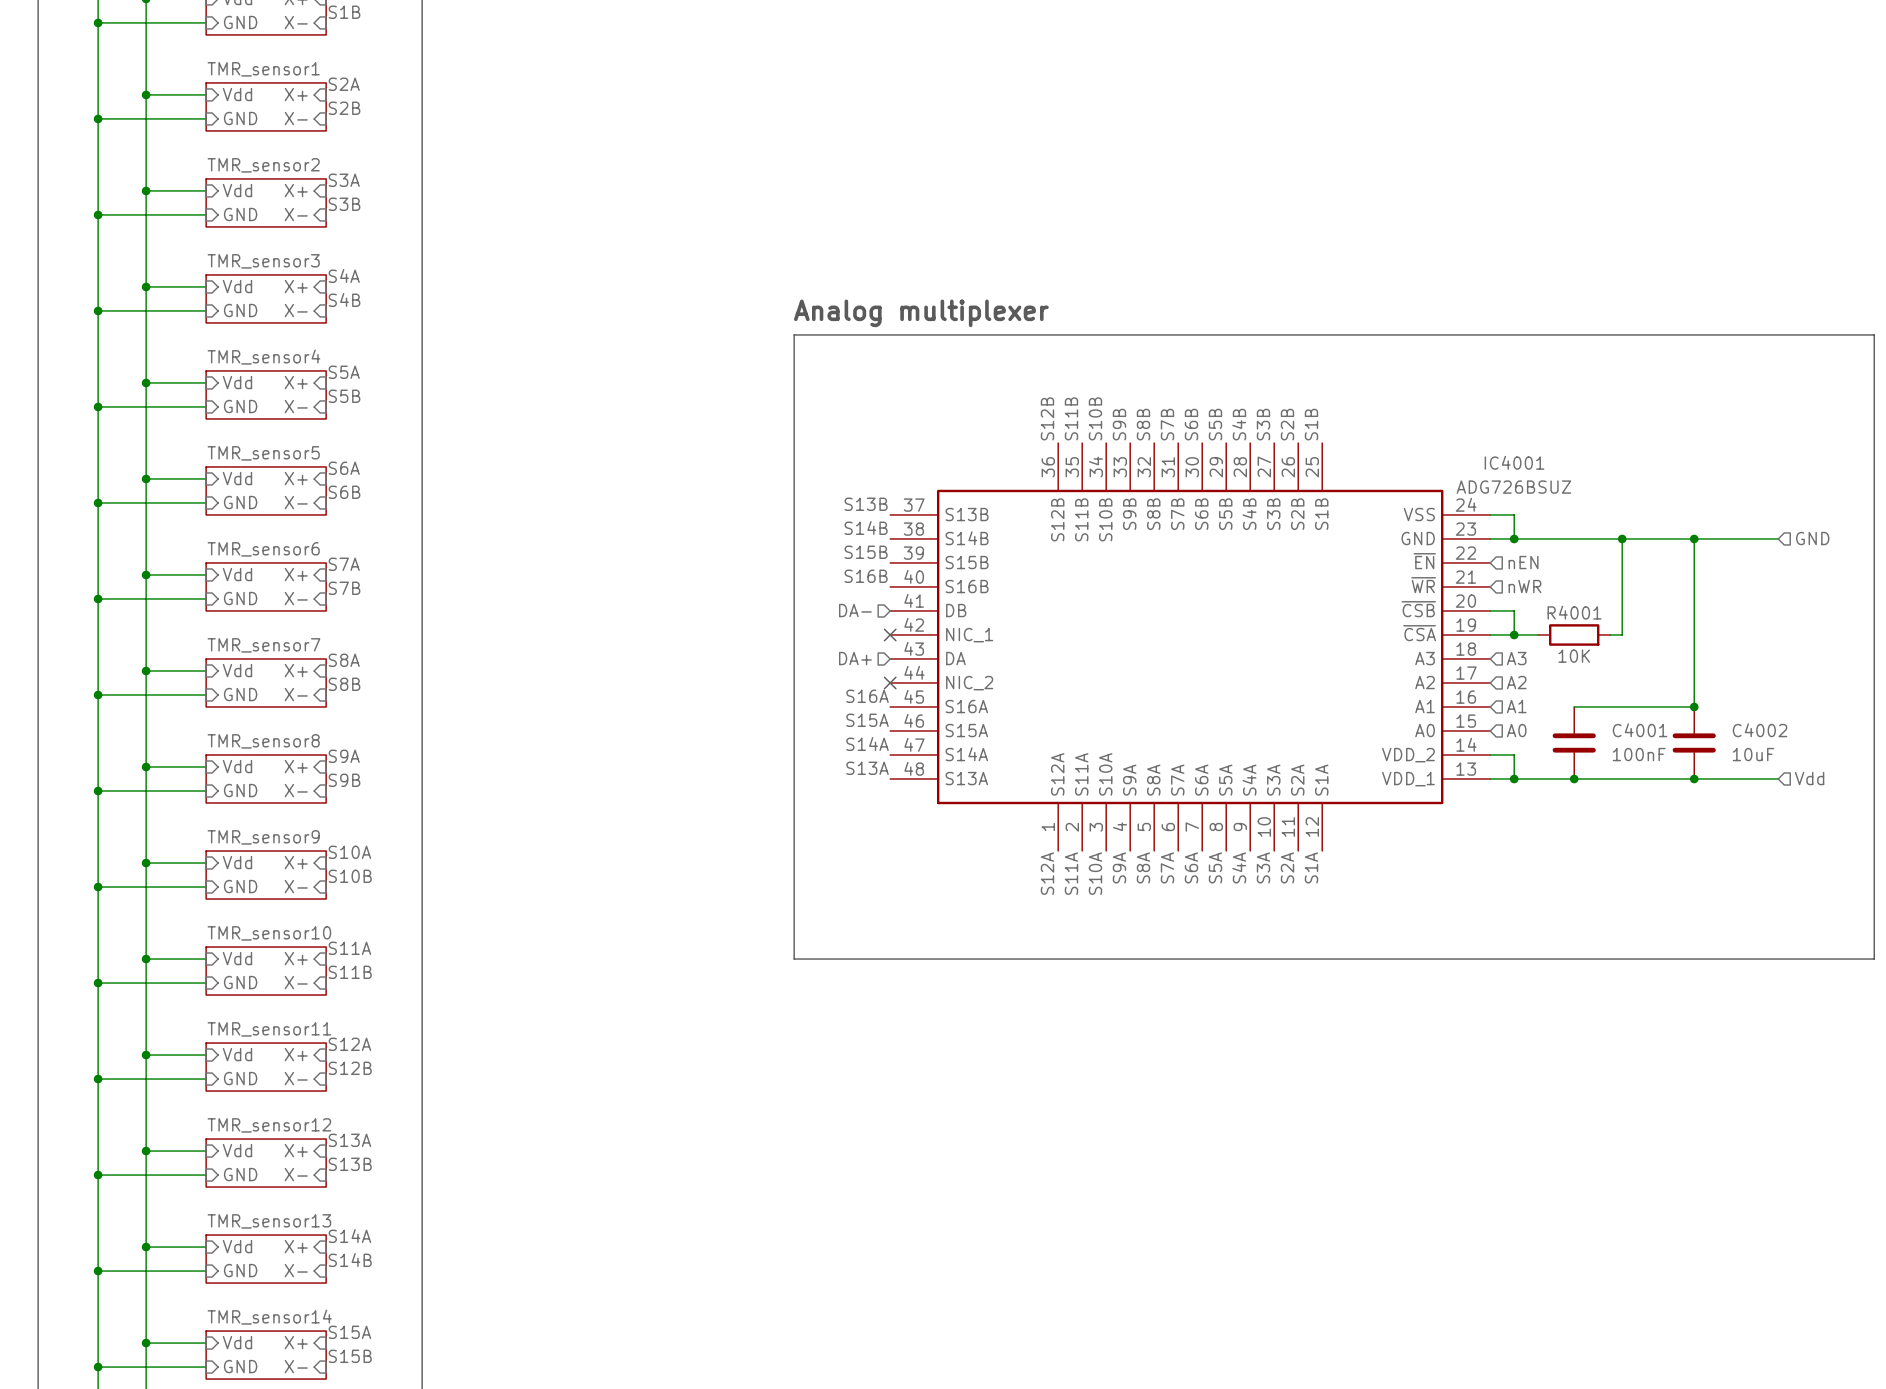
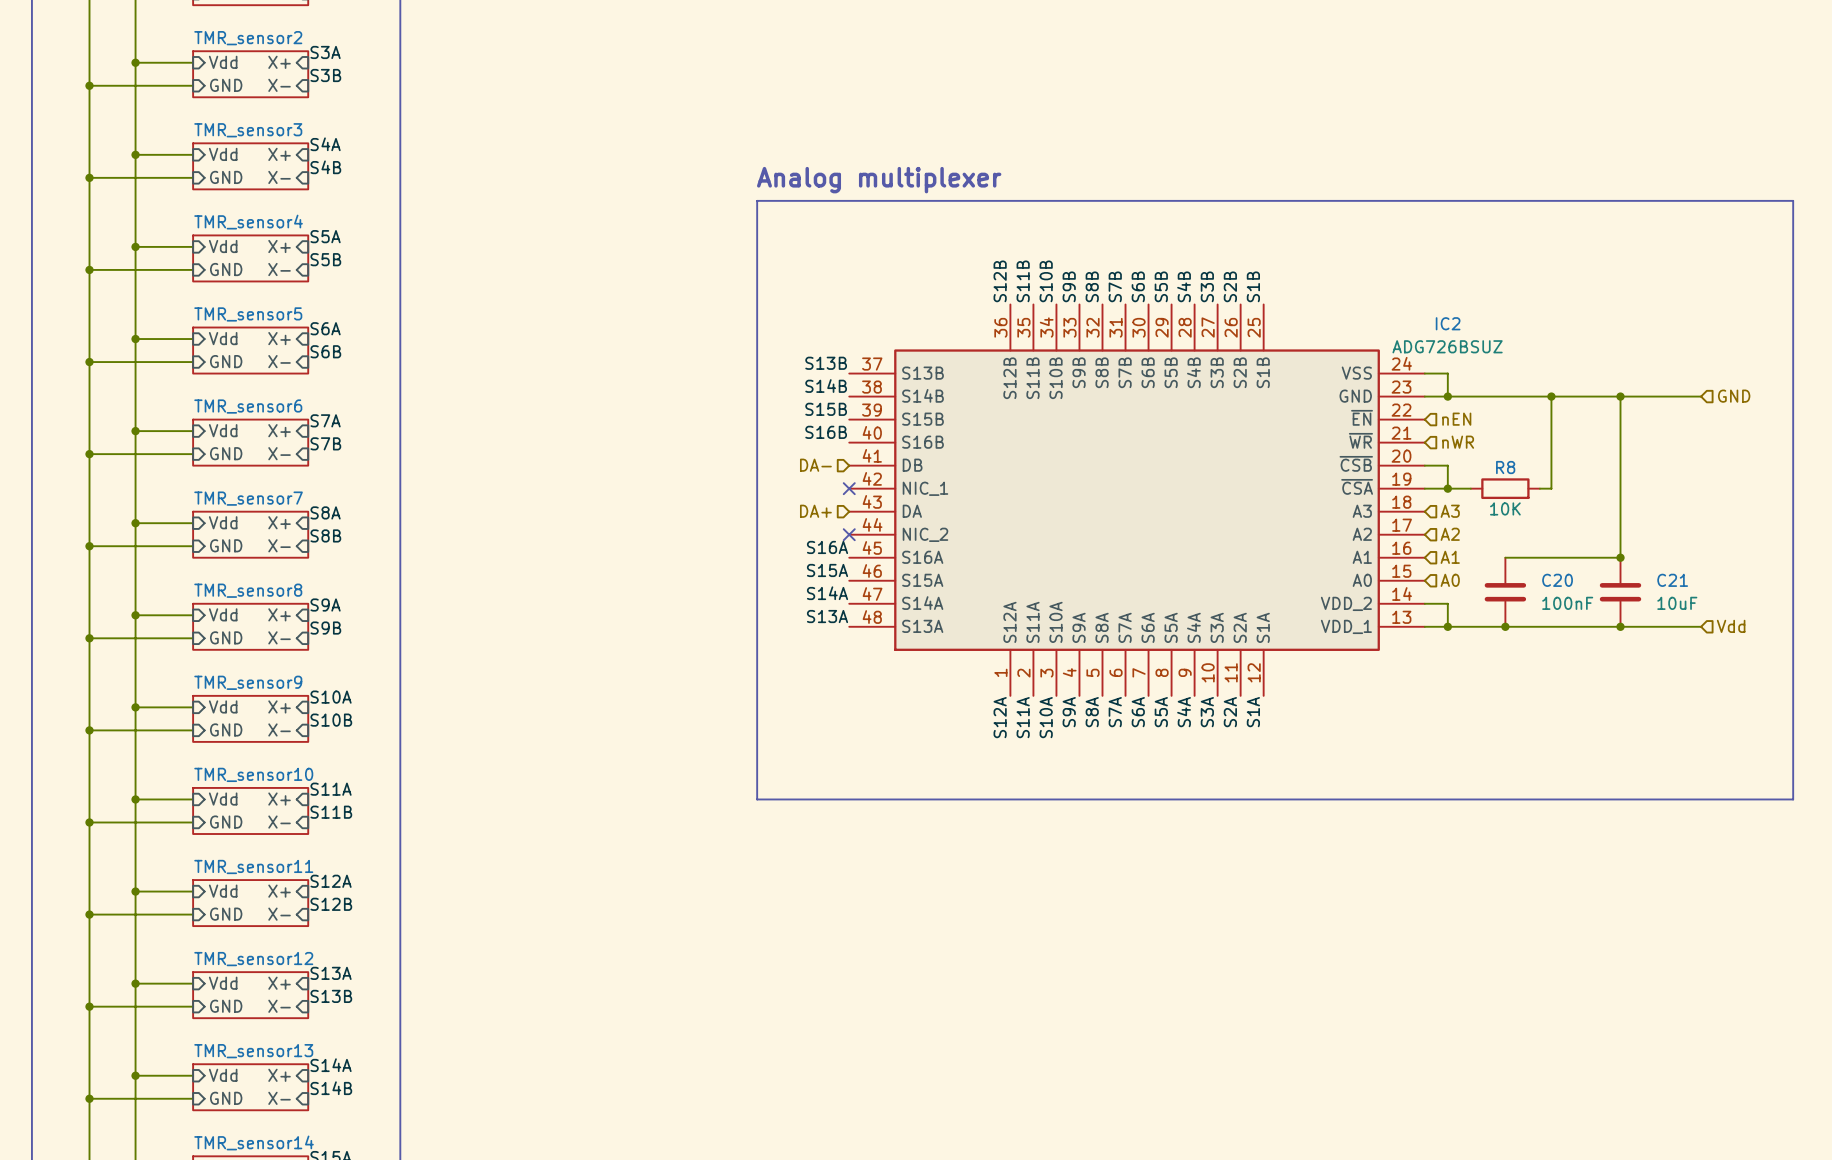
IC4001 name: IC4001 (1514, 462) -> IC2 (1448, 323)
R4001 name: R4001 (1574, 612) -> R8 (1505, 467)
C4001 name: C4001 (1640, 730) -> C20 (1557, 580)
C4002 name: C4002 (1760, 730) -> C21 (1672, 580)

